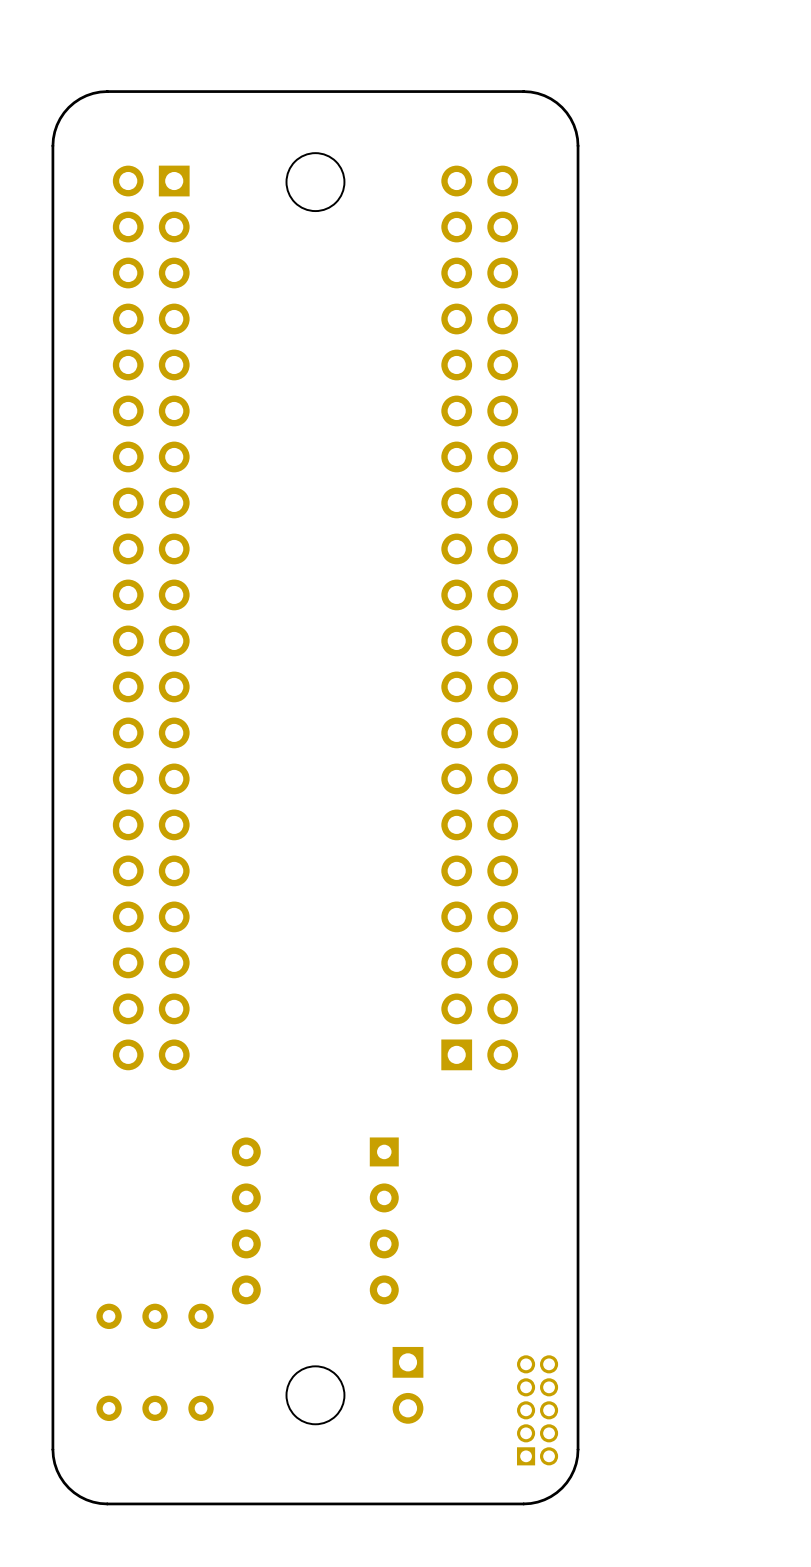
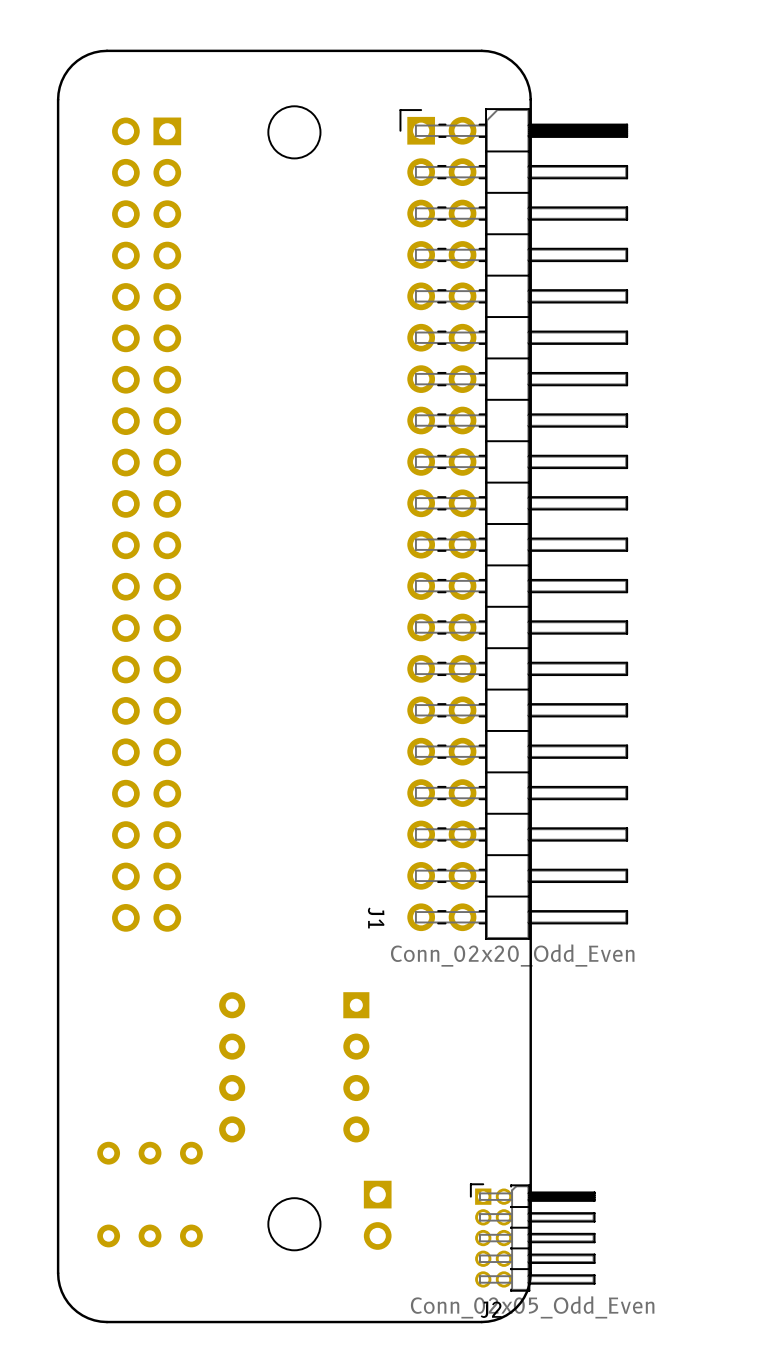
J1 side: top (479, 617) -> bottom (513, 524)
J2 side: top (537, 1410) -> bottom (532, 1237)

